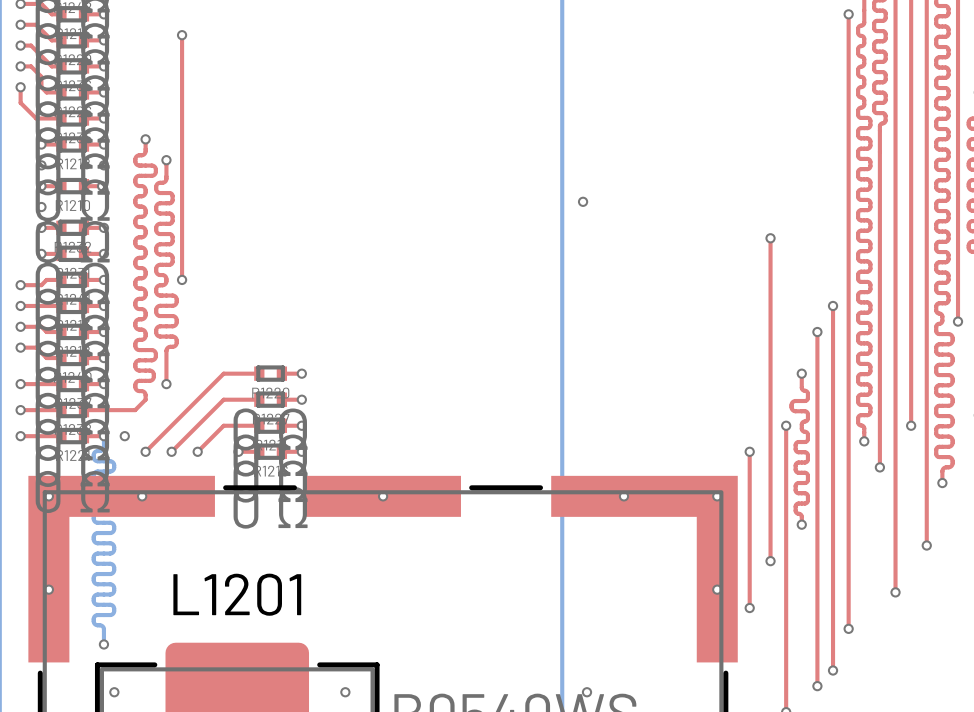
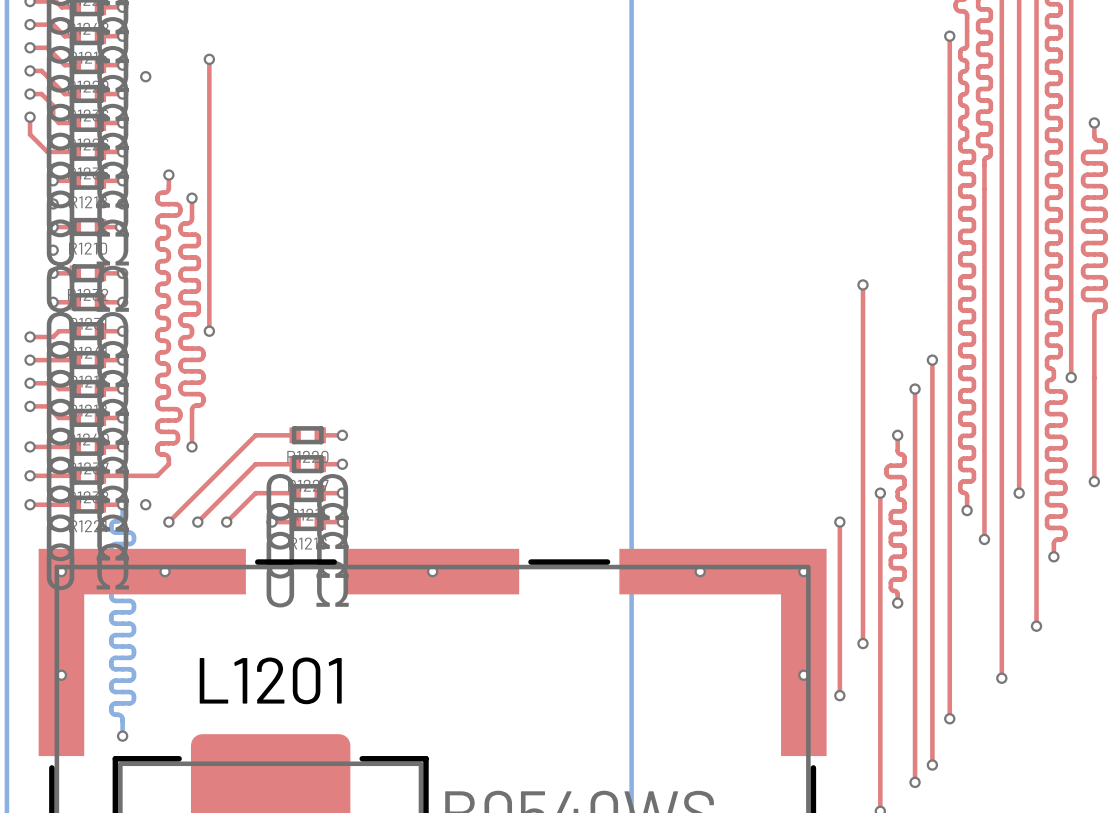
via: none -> (145, 76)
via: (583, 201) -> none
via: (114, 692) -> none
via: (345, 692) -> none
via: (587, 692) -> none

